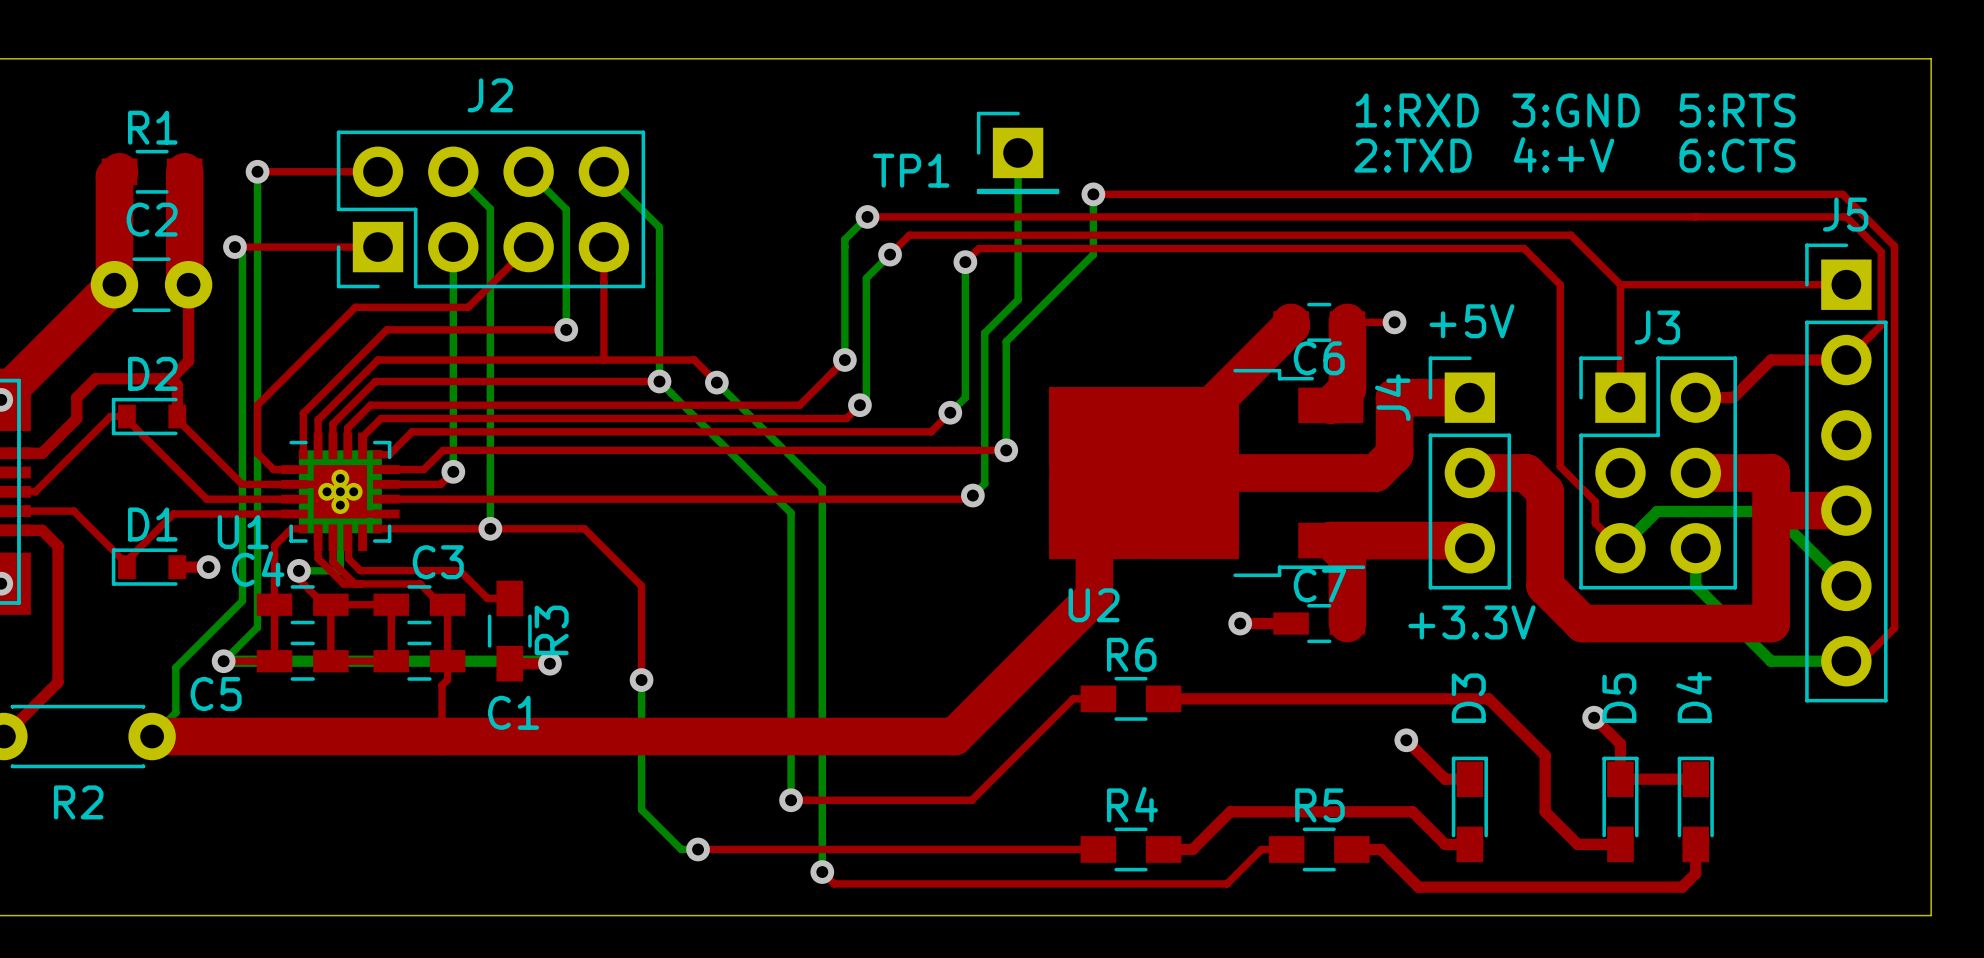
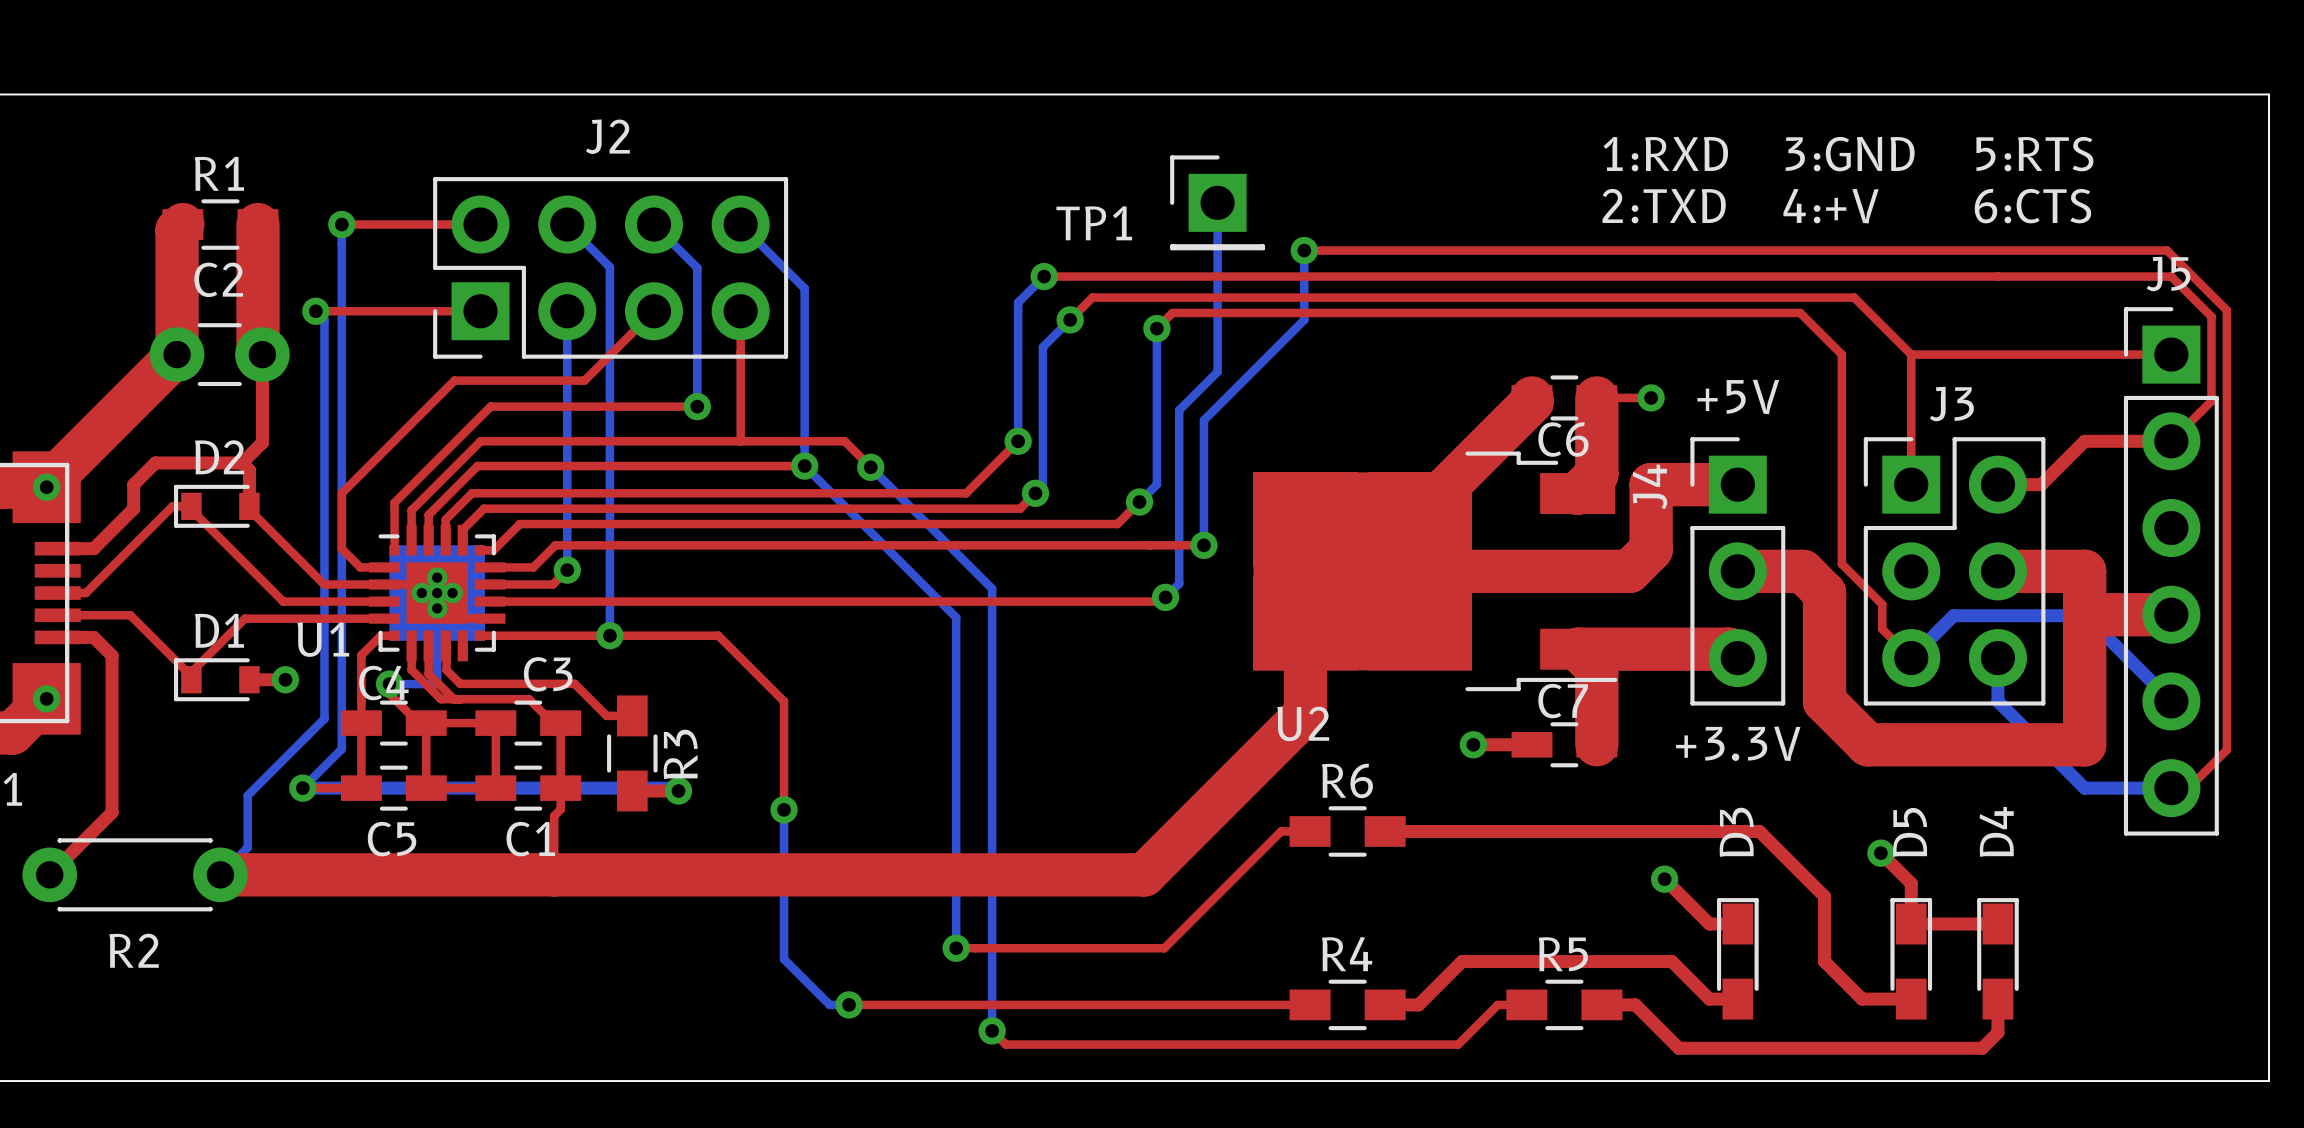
C4 name position: C4 (258, 569) -> C4 (383, 683)
C5 name position: C5 (216, 693) -> C5 (392, 839)
C1 name position: C1 (513, 712) -> C1 (530, 839)

